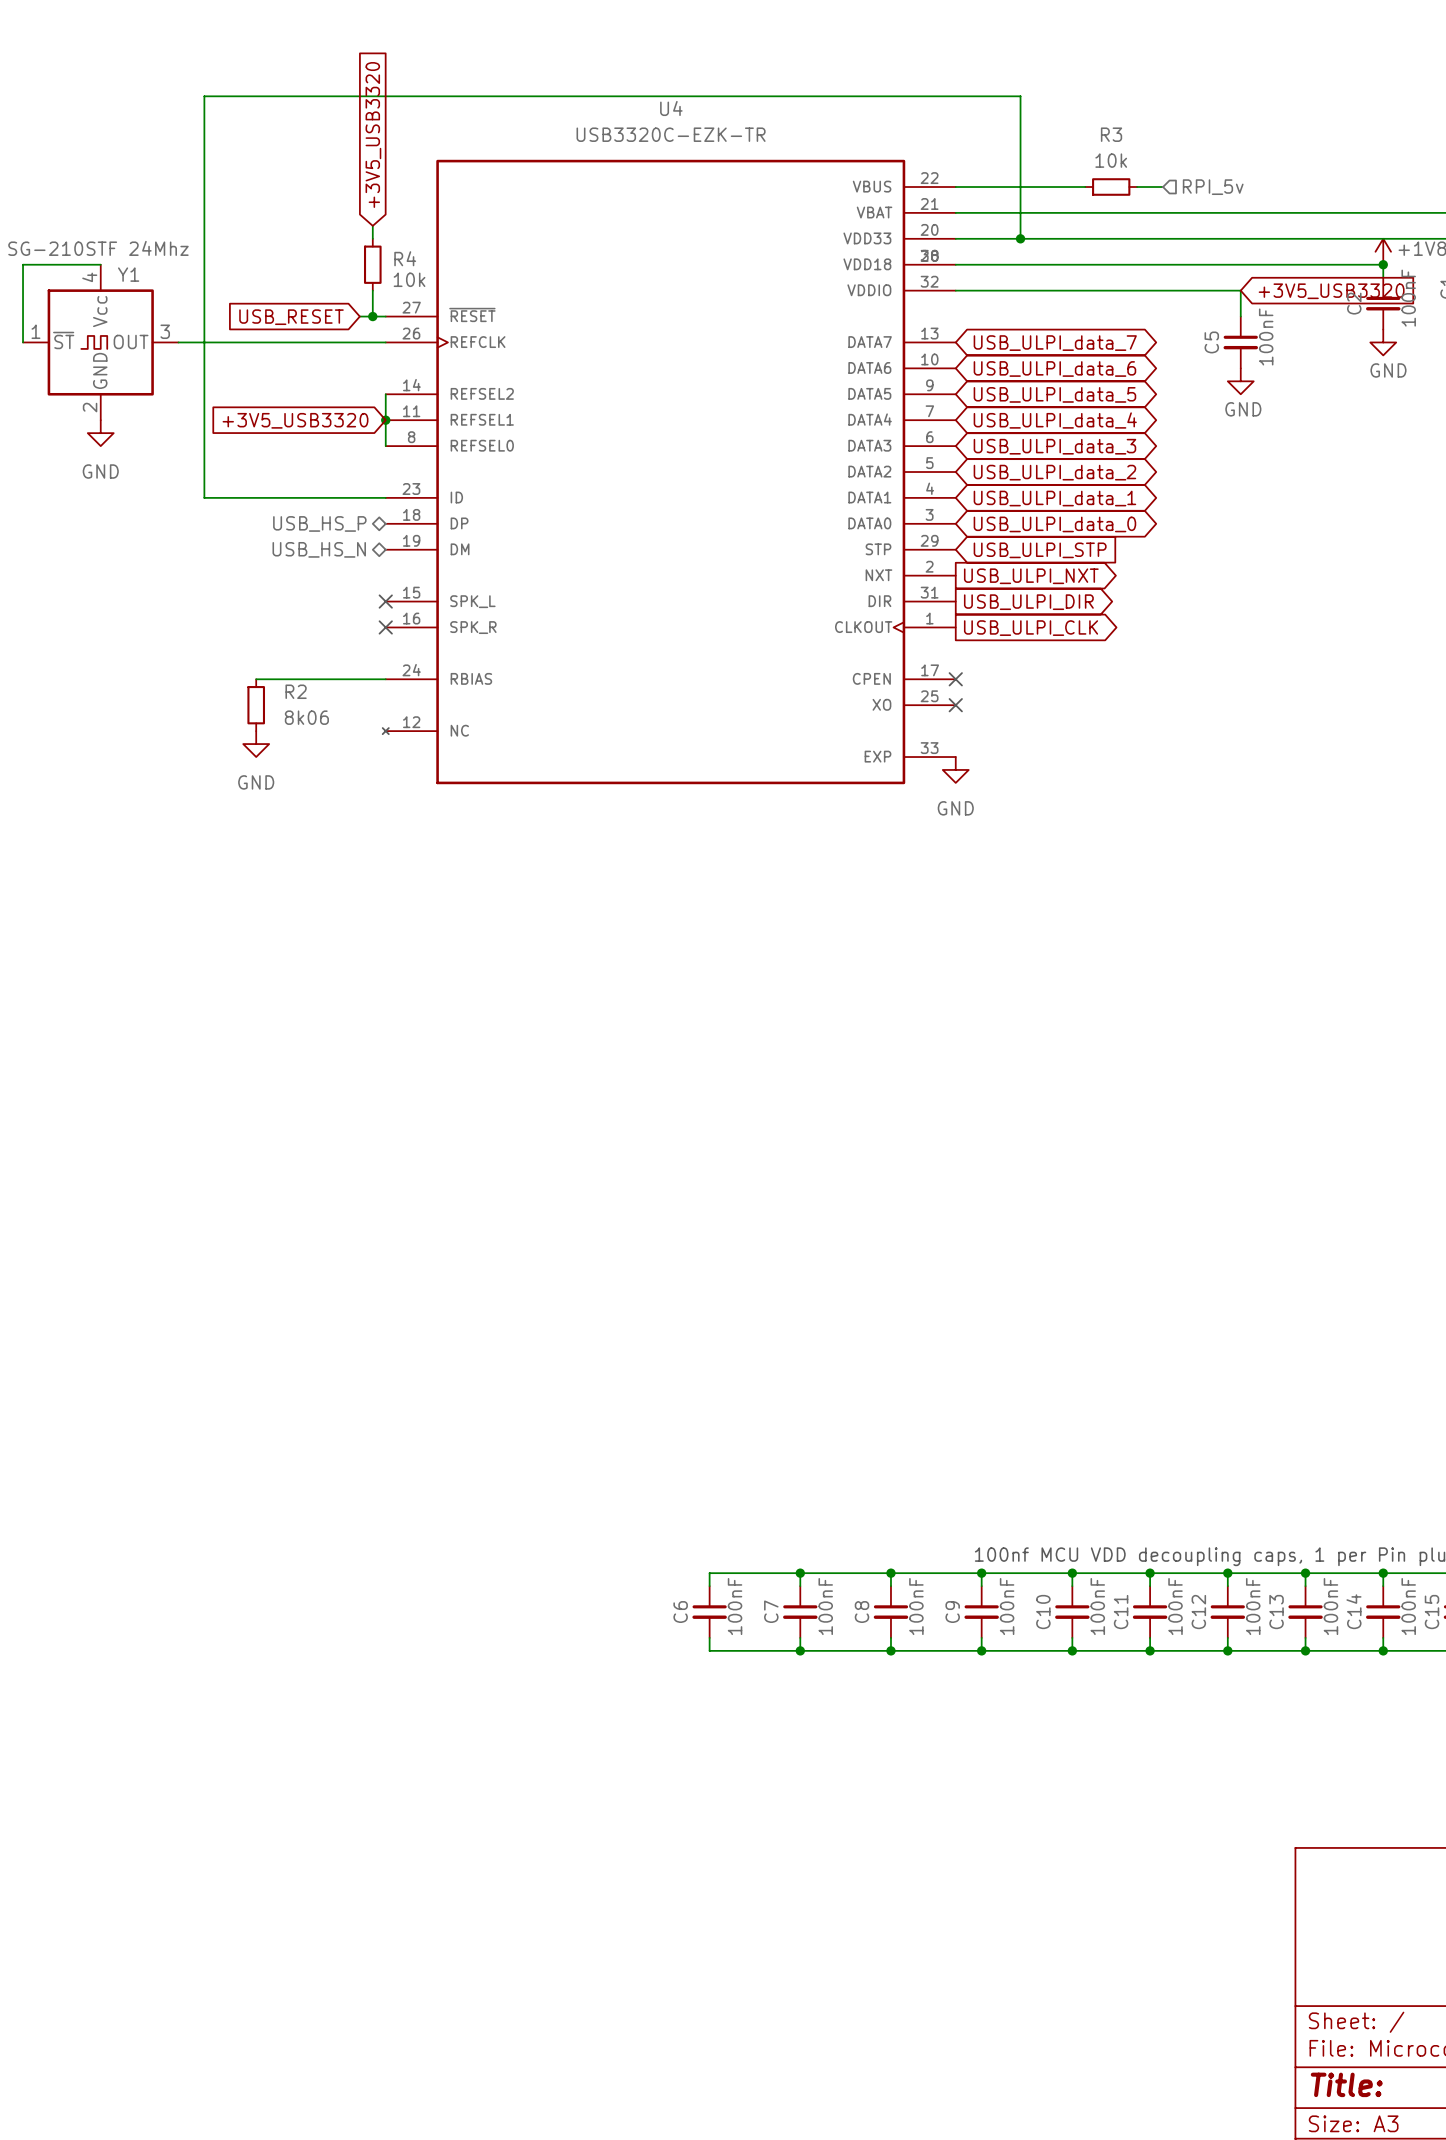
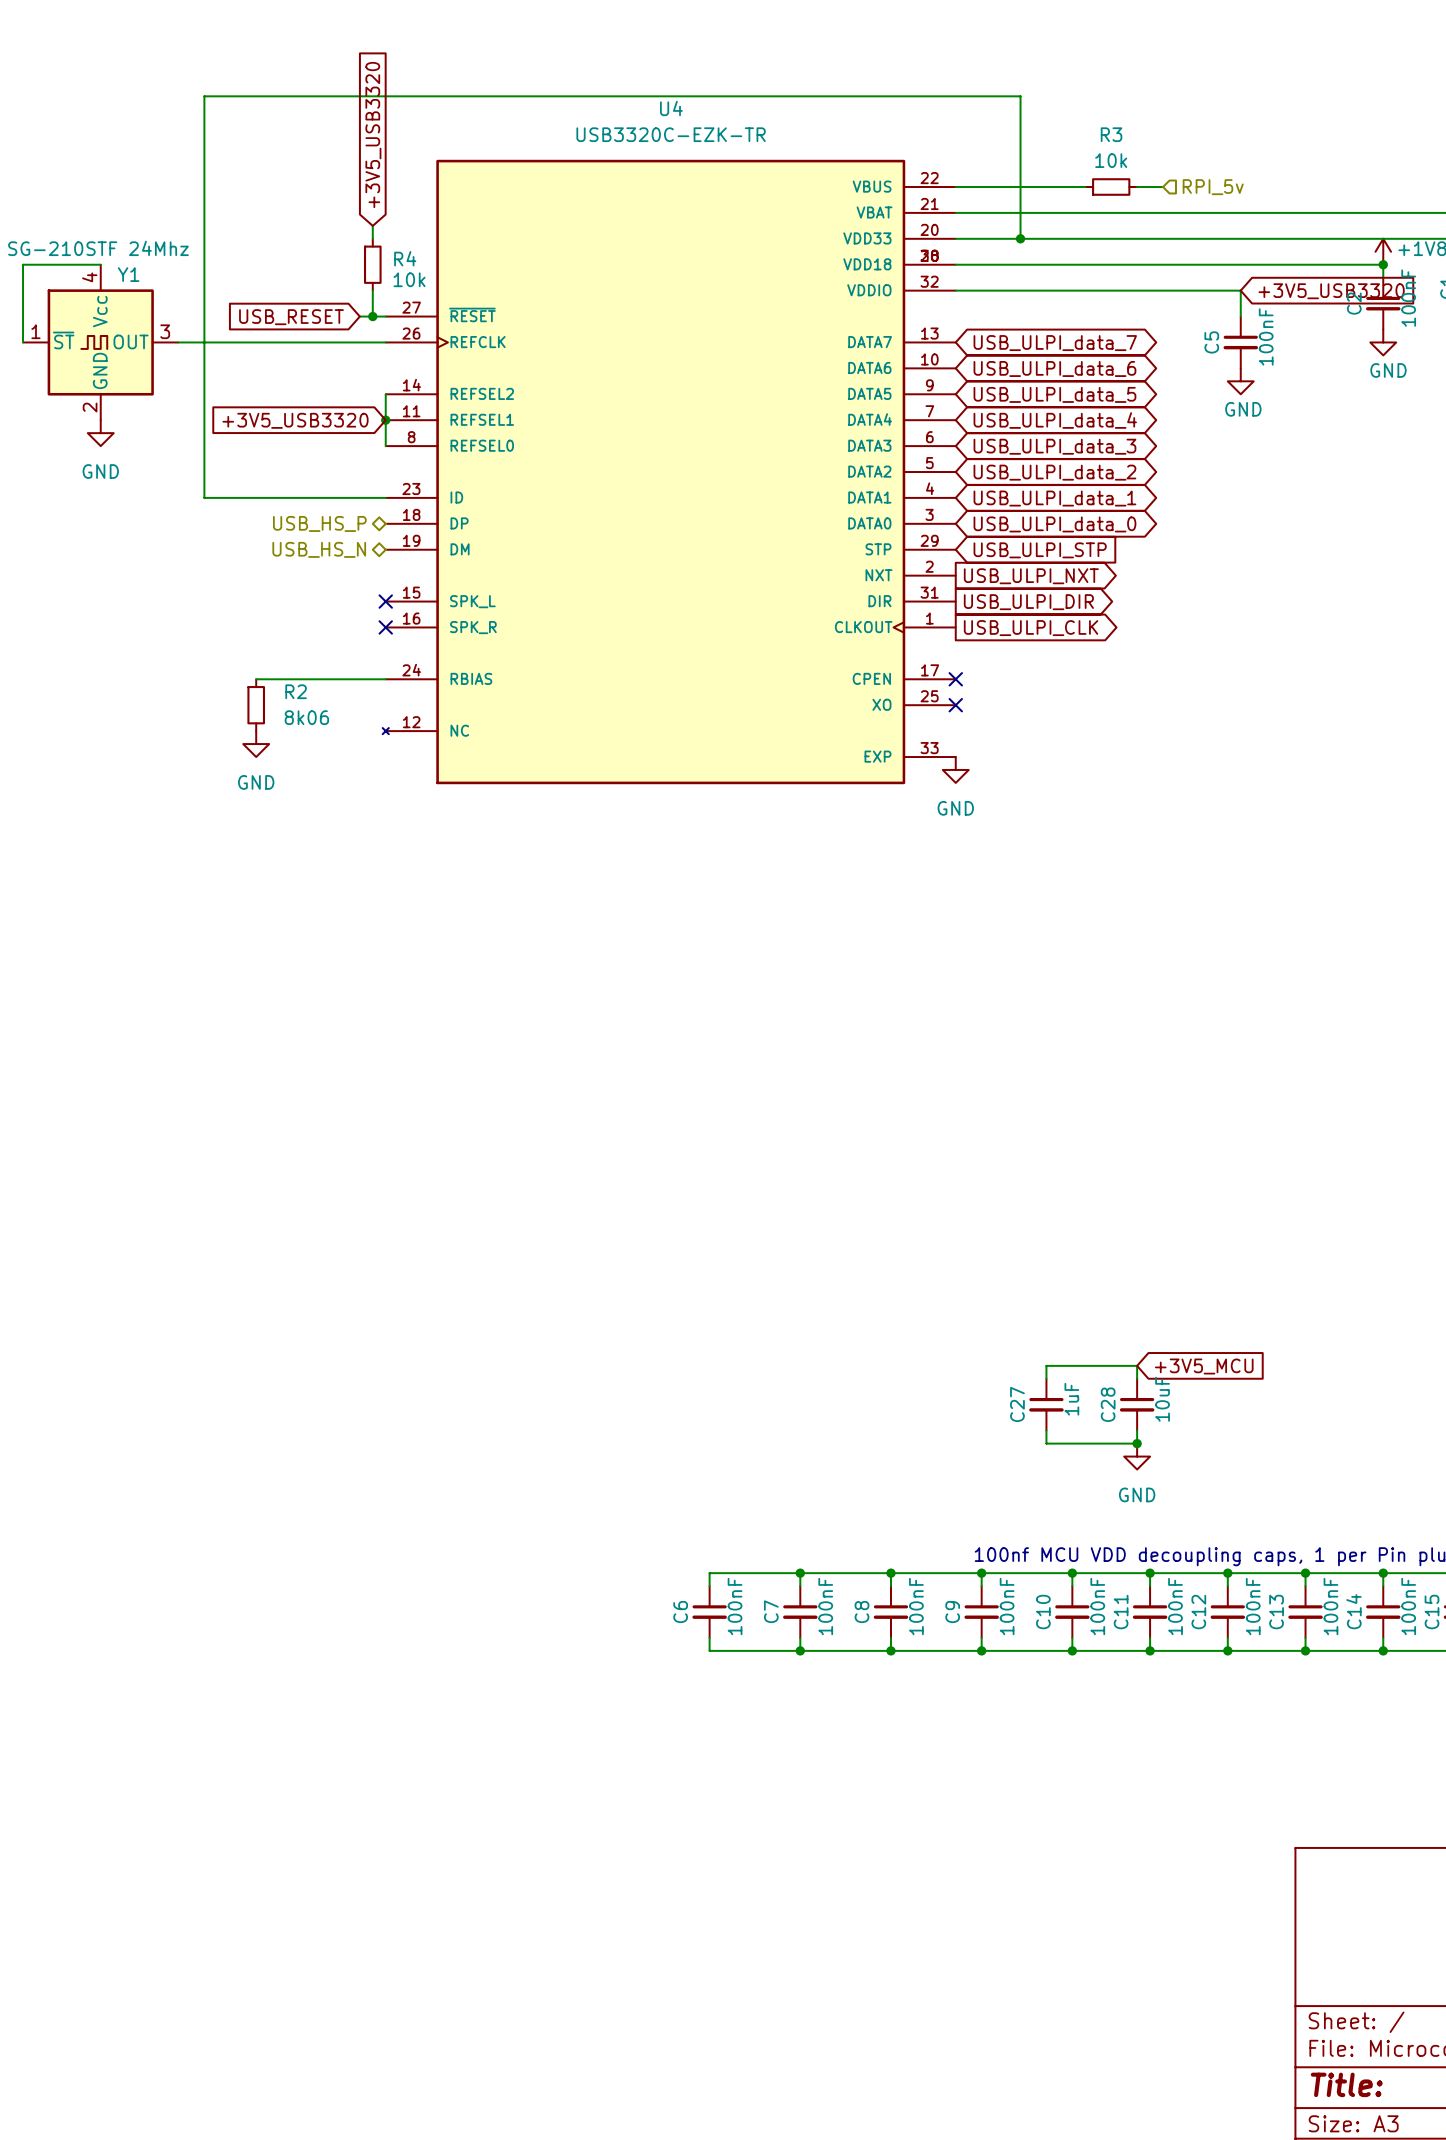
global label: none -> +3V5_MCU (1204, 1366)
wire: none -> (1046, 1378) (1046, 1365) (1137, 1365) (1137, 1378)
C27: none -> 1uF (1046, 1404)
C28: none -> 10uF (1137, 1404)
wire: none -> (1046, 1430) (1046, 1443) (1137, 1443) (1137, 1430)
junction: none -> (1137, 1443)
power symbol: none -> GND (1137, 1456)

